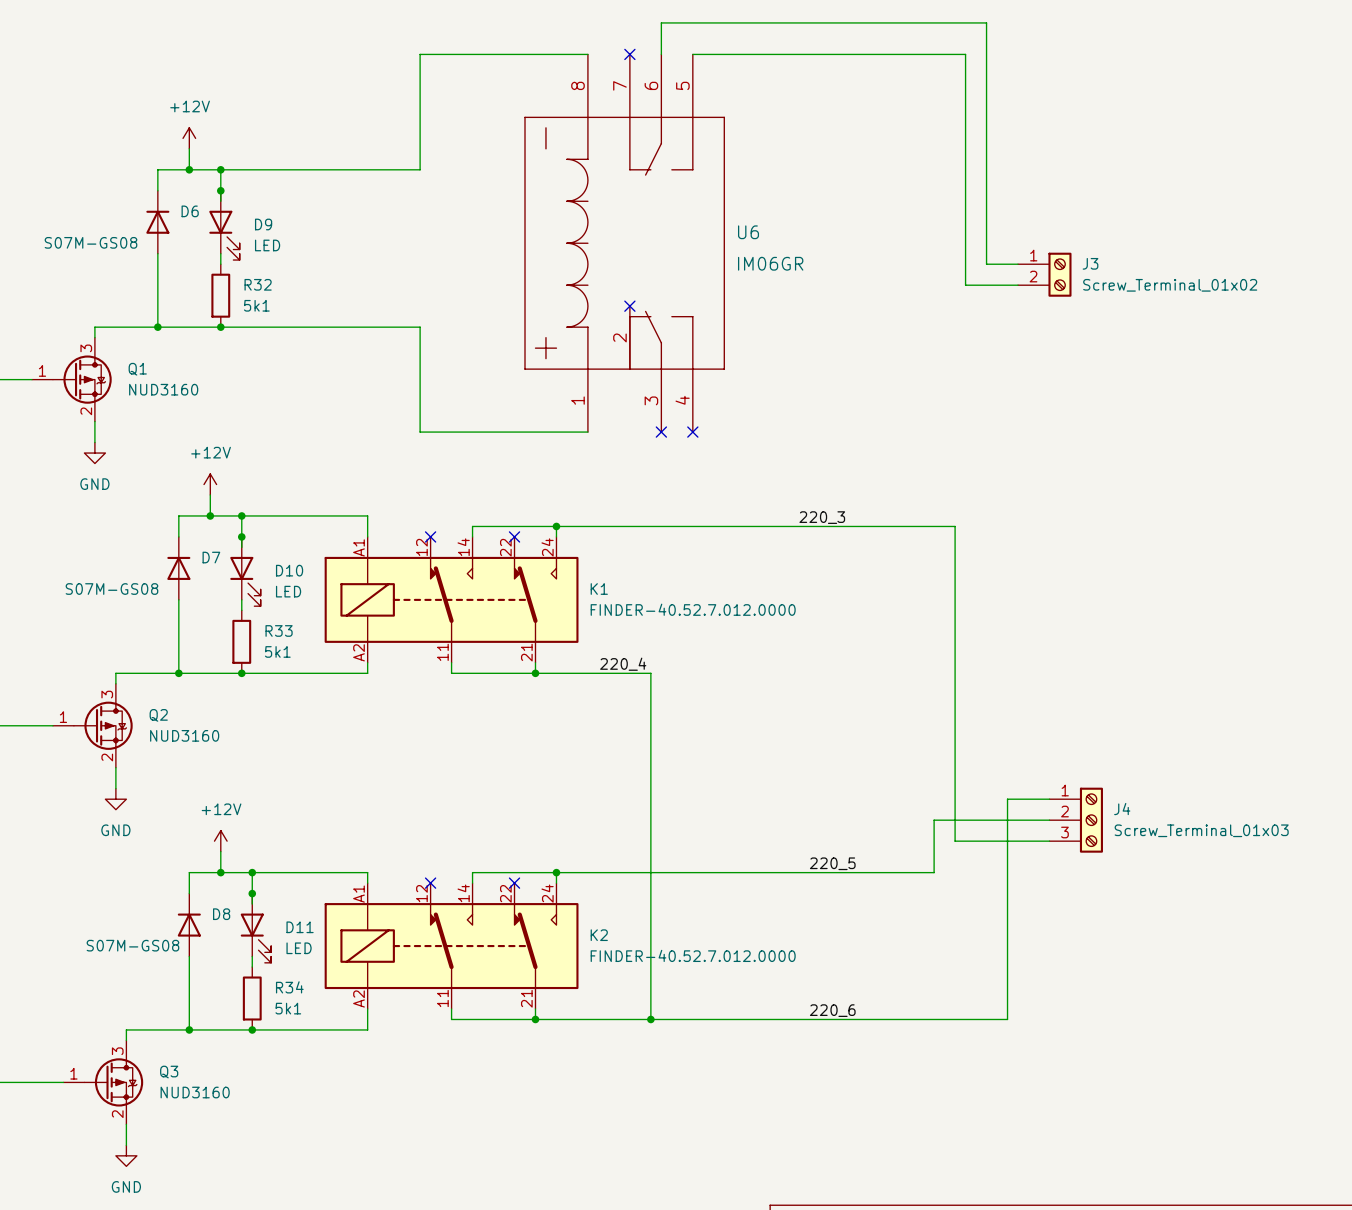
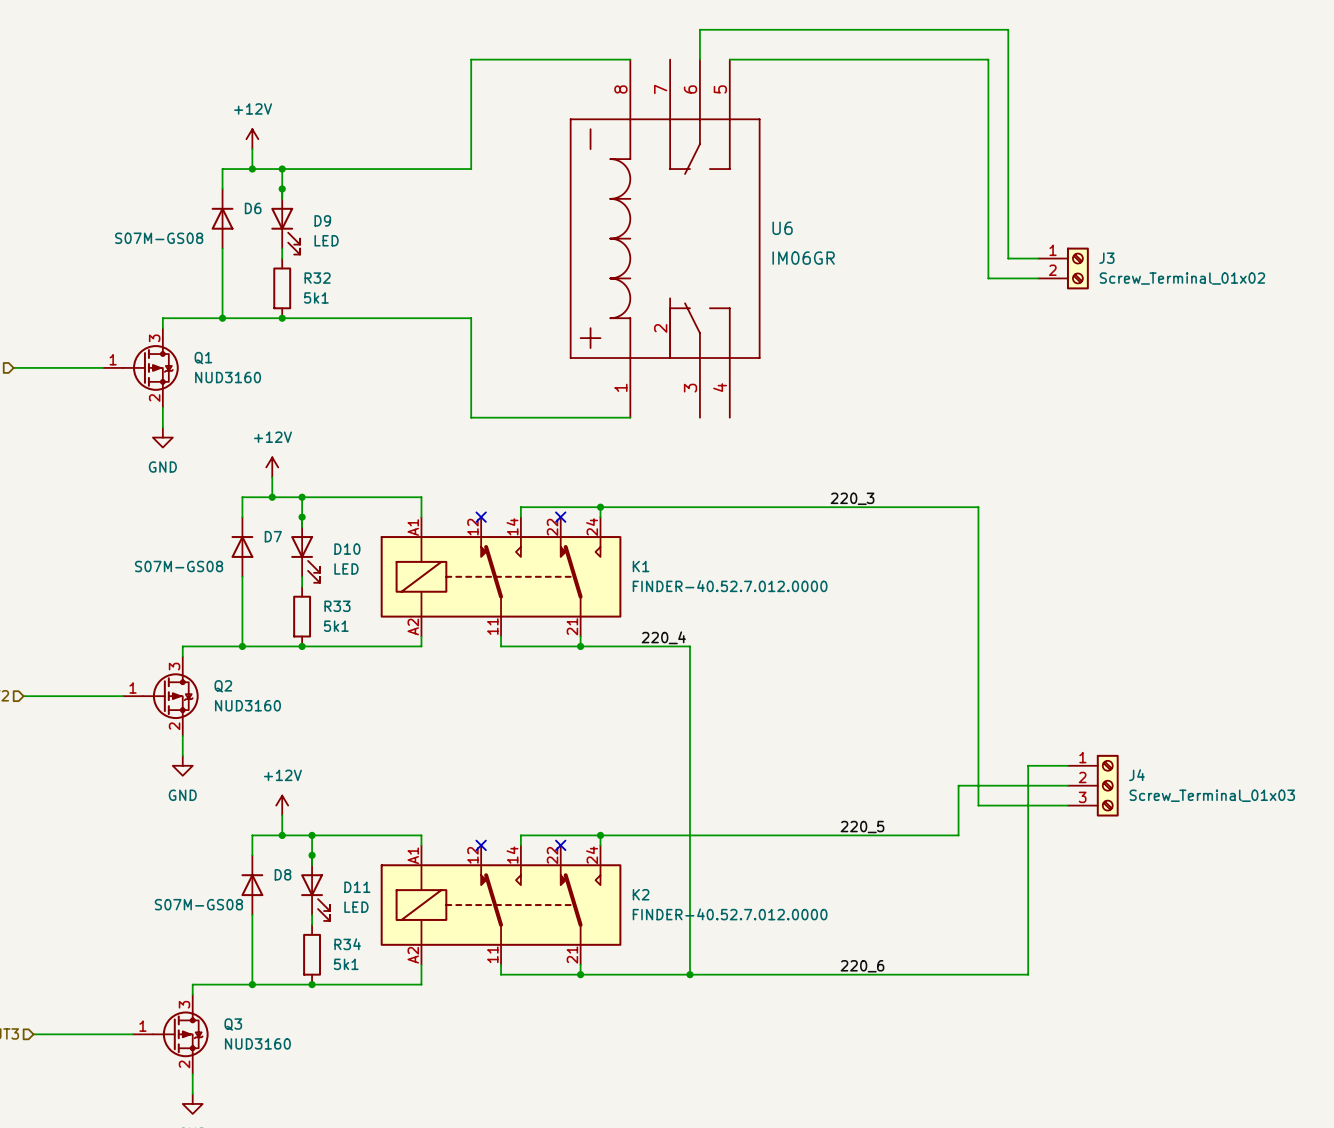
no-connect mark: (629, 54) -> none
no-connect mark: (629, 306) -> none
no-connect mark: (661, 432) -> none
no-connect mark: (692, 432) -> none

